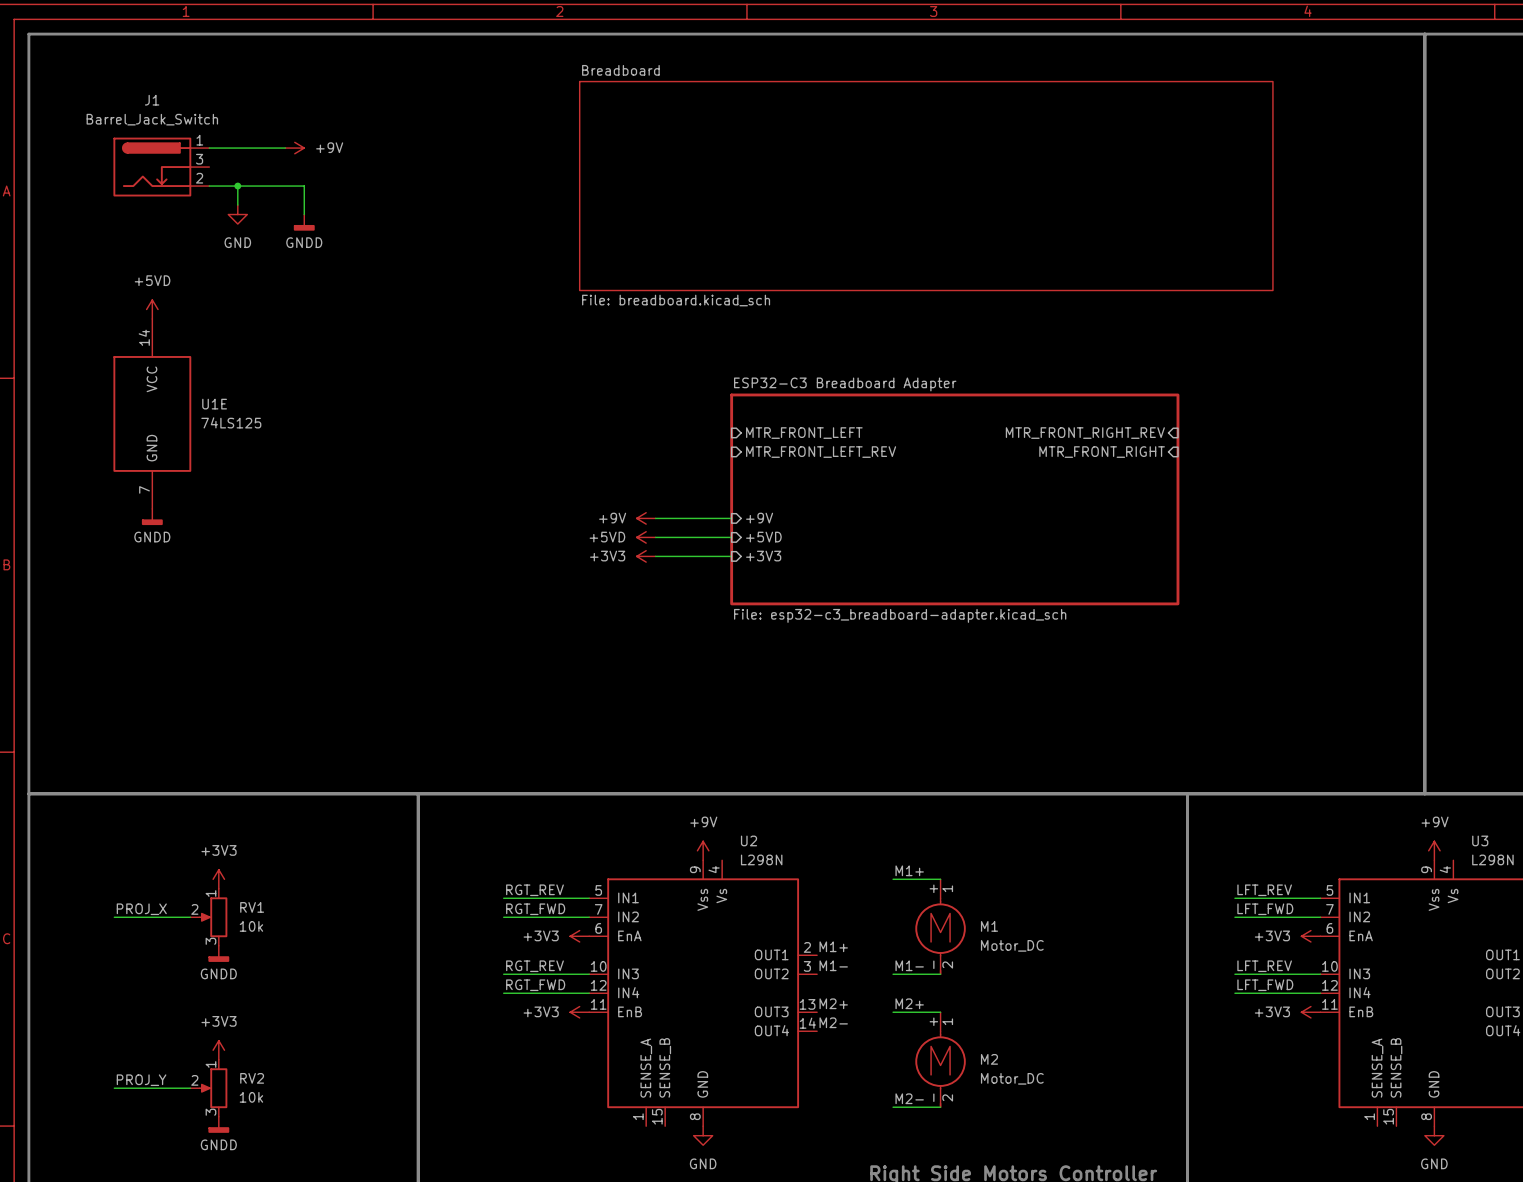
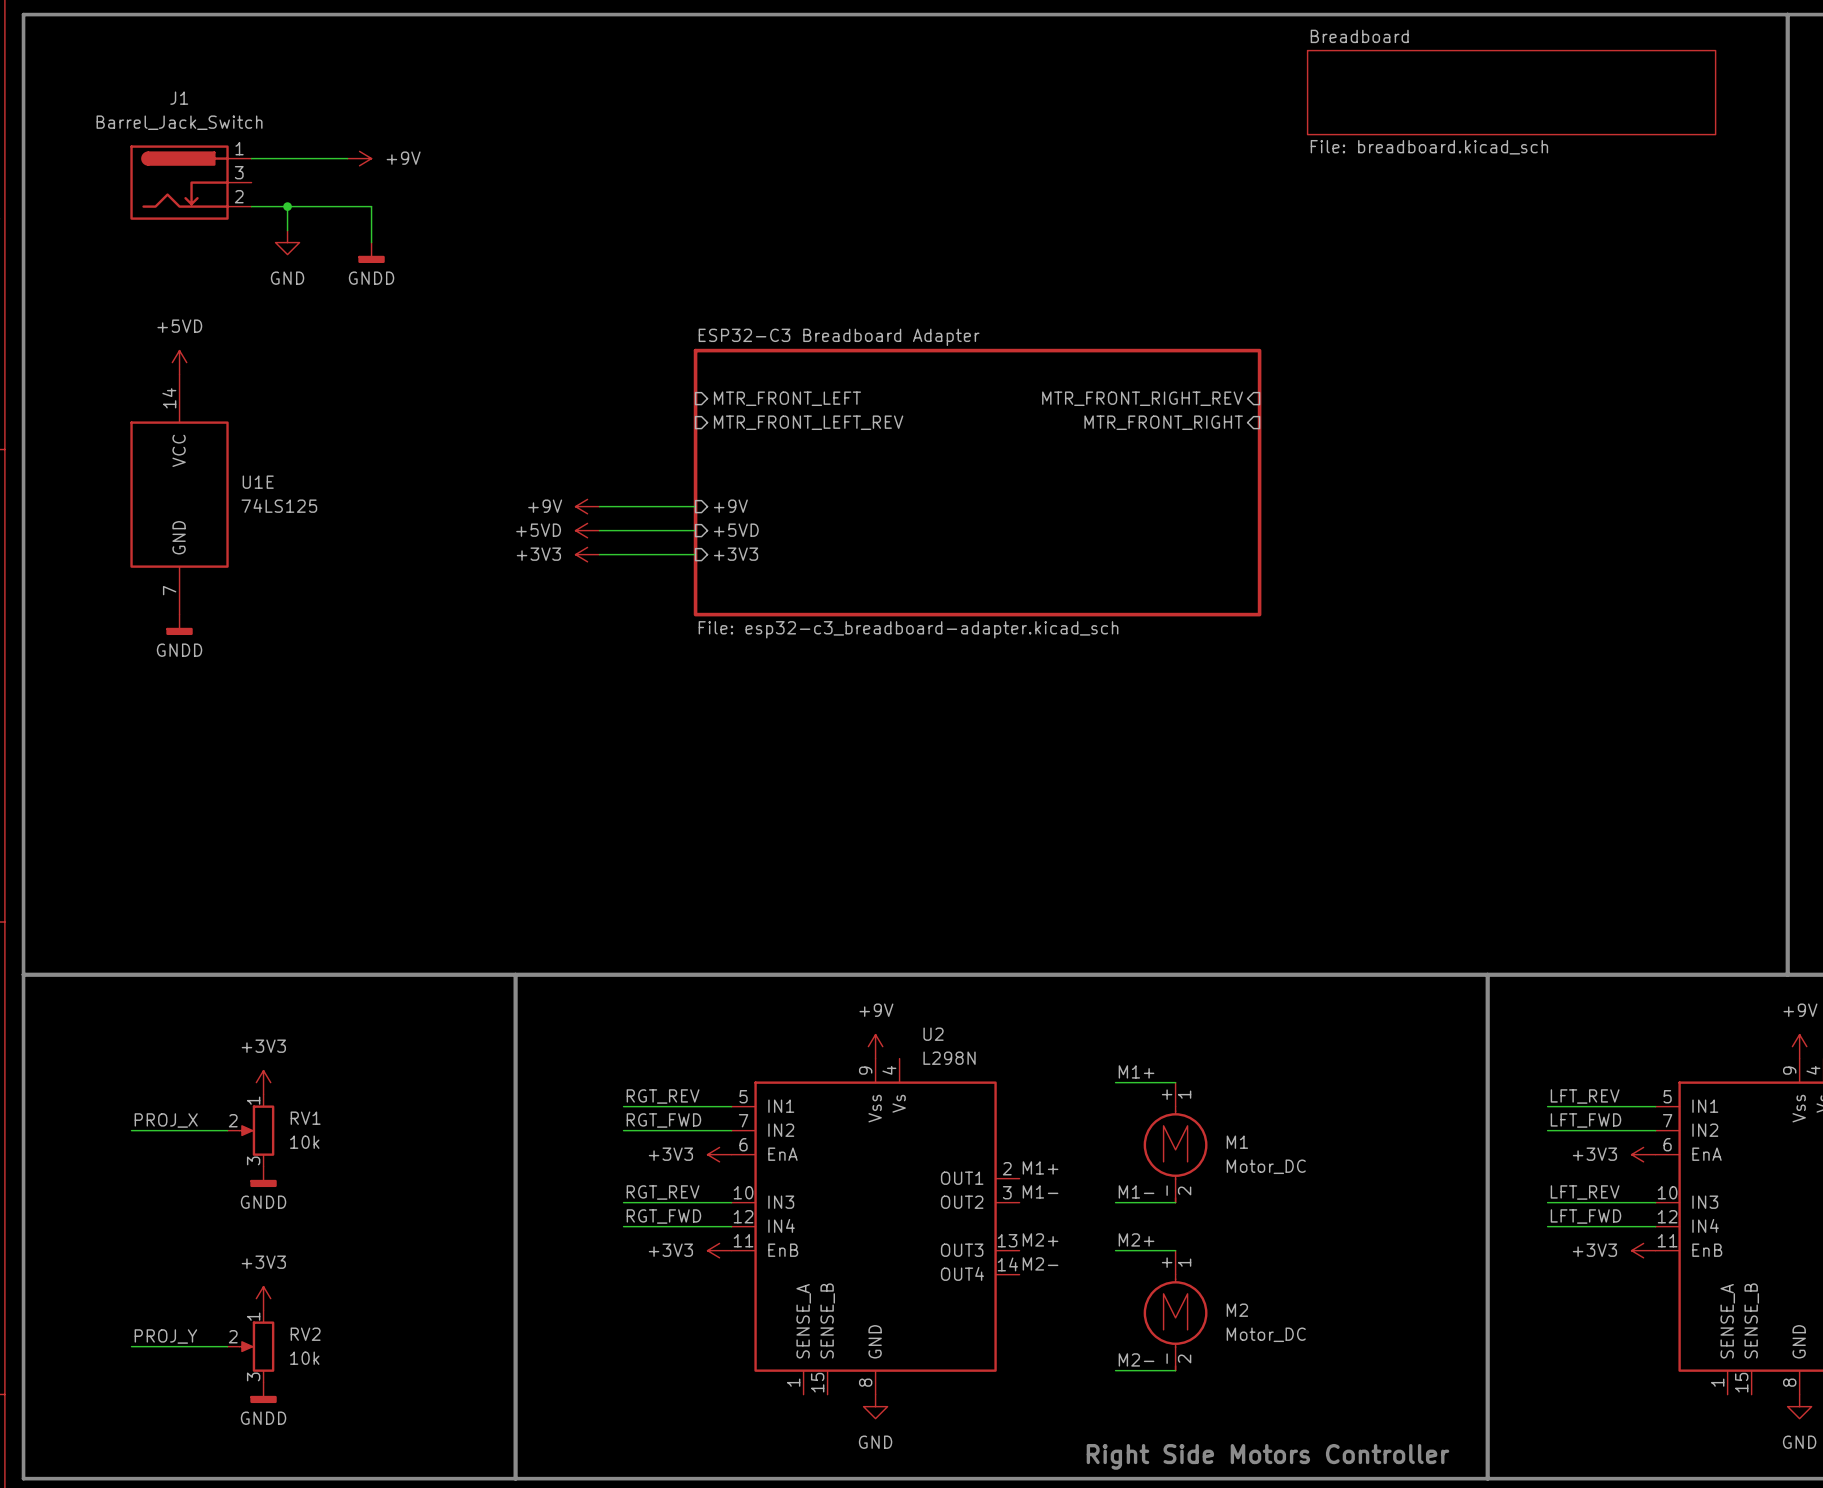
sheet Breadboard: none -> File: breadboard.kicad_sch (1511, 92)
sheet Breadboard: File: breadboard.kicad_sch (926, 186) -> none
sheet pin: none -> MTR_FRONT_LEFT (787, 398)
sheet pin: none -> MTR_FRONT_RIGHT_REV (1142, 398)
sheet pin: none -> MTR_FRONT_LEFT_REV (808, 422)
sheet pin: none -> MTR_FRONT_RIGHT (1163, 422)
power symbol: none -> +9V (587, 506)
wire: none -> (599, 506) (695, 506)
sheet pin: none -> +9V (730, 506)
sheet pin: MTR_FRONT_LEFT (804, 433) -> none
sheet pin: MTR_FRONT_RIGHT_REV (1085, 433) -> none
power symbol: none -> +5VD (587, 530)
wire: none -> (599, 530) (695, 530)
sheet pin: none -> +5VD (736, 530)
sheet pin: MTR_FRONT_LEFT_REV (821, 452) -> none
sheet pin: MTR_FRONT_RIGHT (1102, 452) -> none
power symbol: none -> +3V3 (587, 554)
sheet pin: none -> +3V3 (736, 554)
sheet ESP32-C3 Breadboard Adapter position: (954, 499) -> (977, 482)
power symbol: +9V (646, 518) -> none
wire: (655, 518) (731, 518) -> (599, 554) (695, 554)
sheet pin: +9V (759, 518) -> none
power symbol: +5VD (646, 537) -> none
wire: (655, 537) (731, 537) -> none
sheet pin: +5VD (763, 537) -> none
power symbol: +3V3 (646, 556) -> none
wire: (655, 556) (731, 556) -> none
sheet pin: +3V3 (763, 556) -> none

